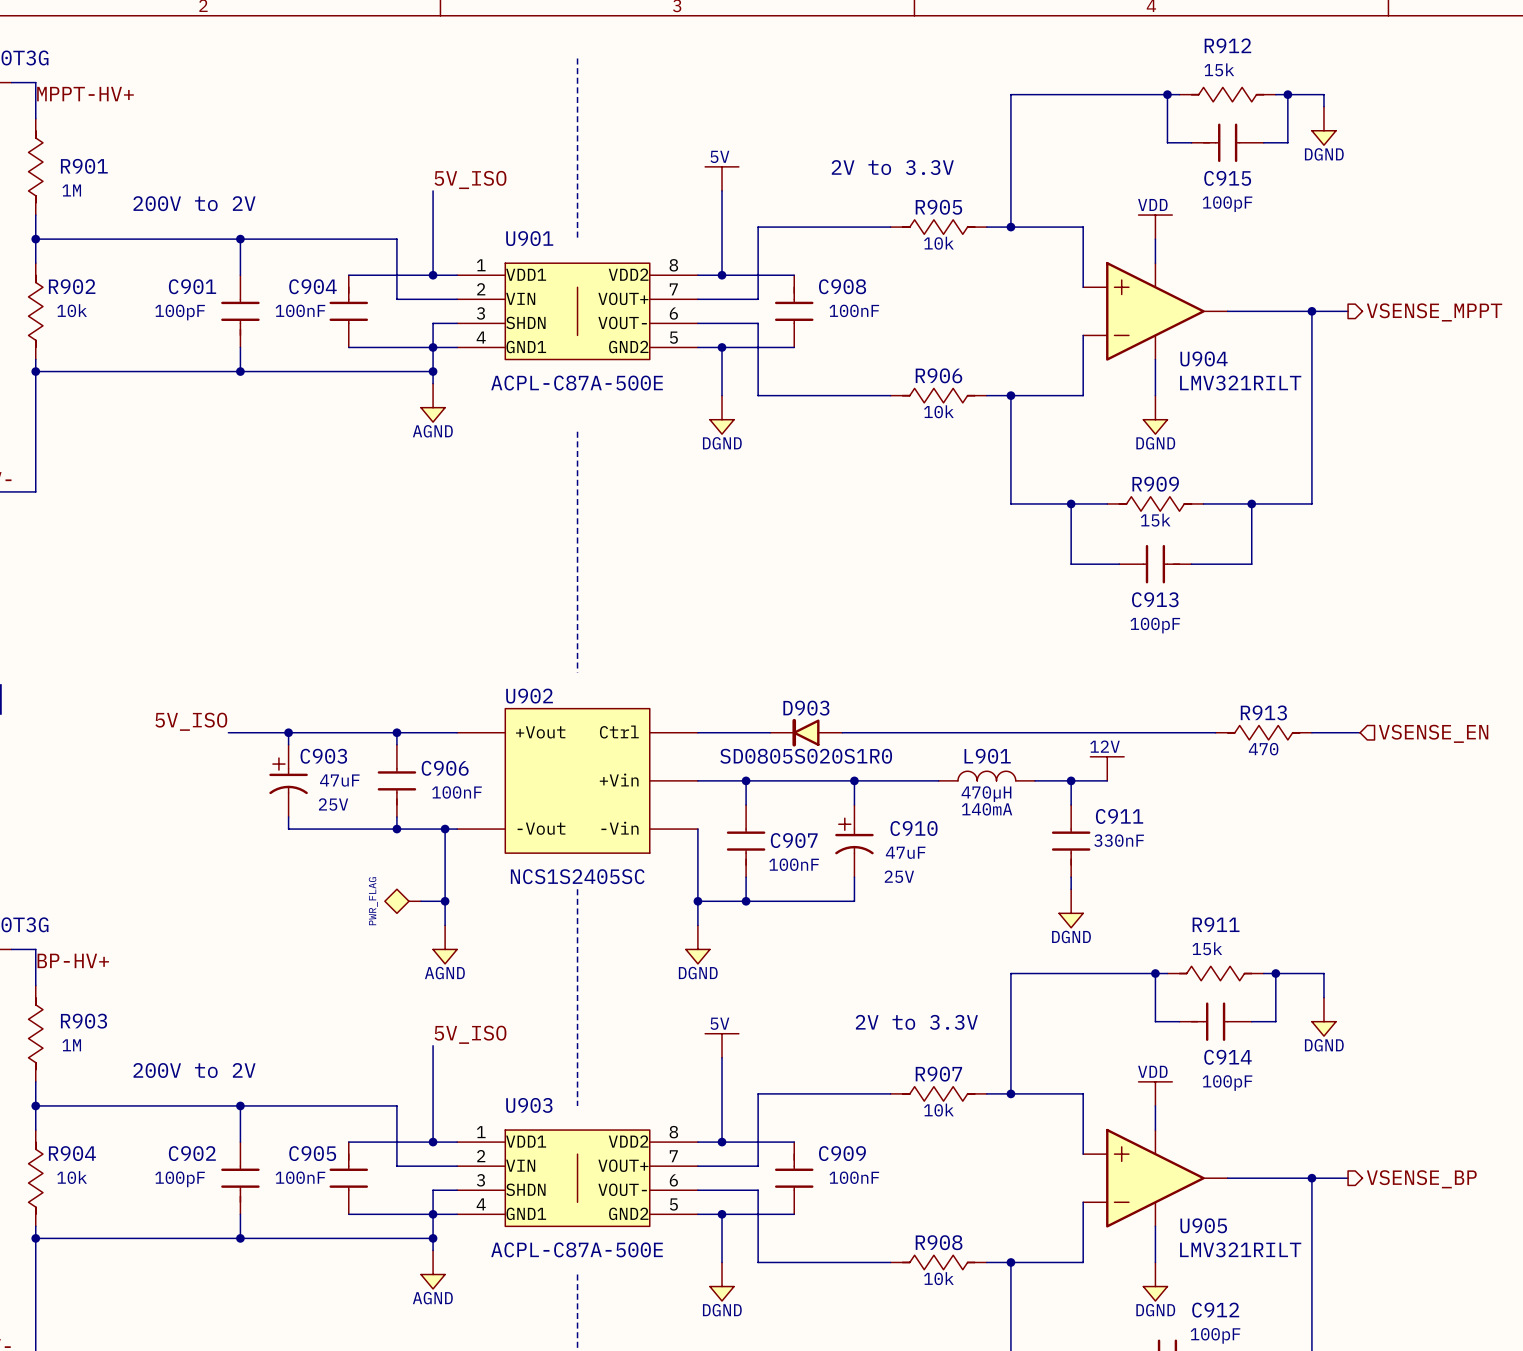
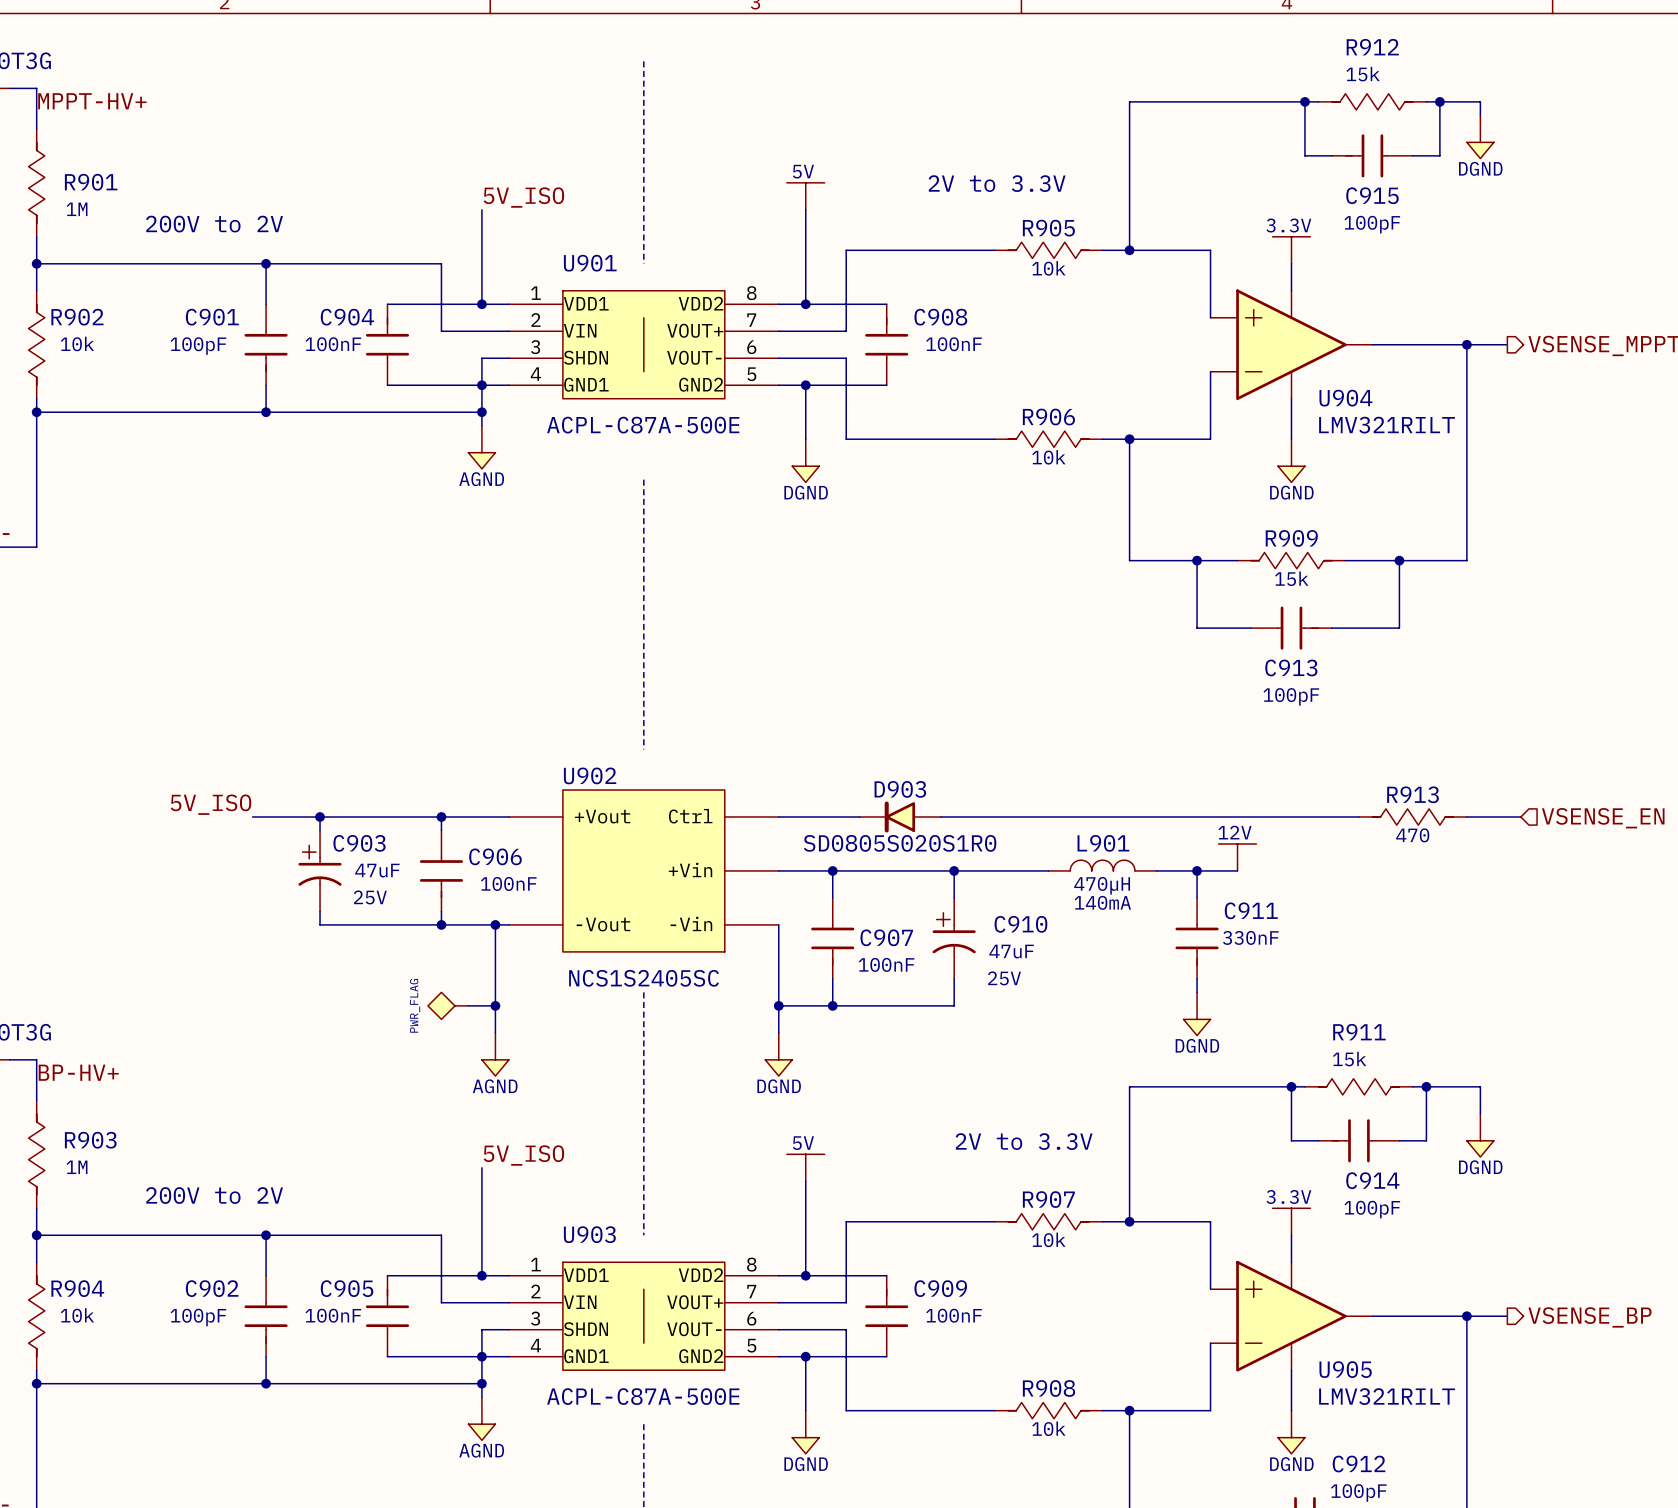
power symbol: VDD (1155, 227) -> 3.3V (1291, 250)
power symbol: VDD (1155, 1093) -> 3.3V (1291, 1221)

